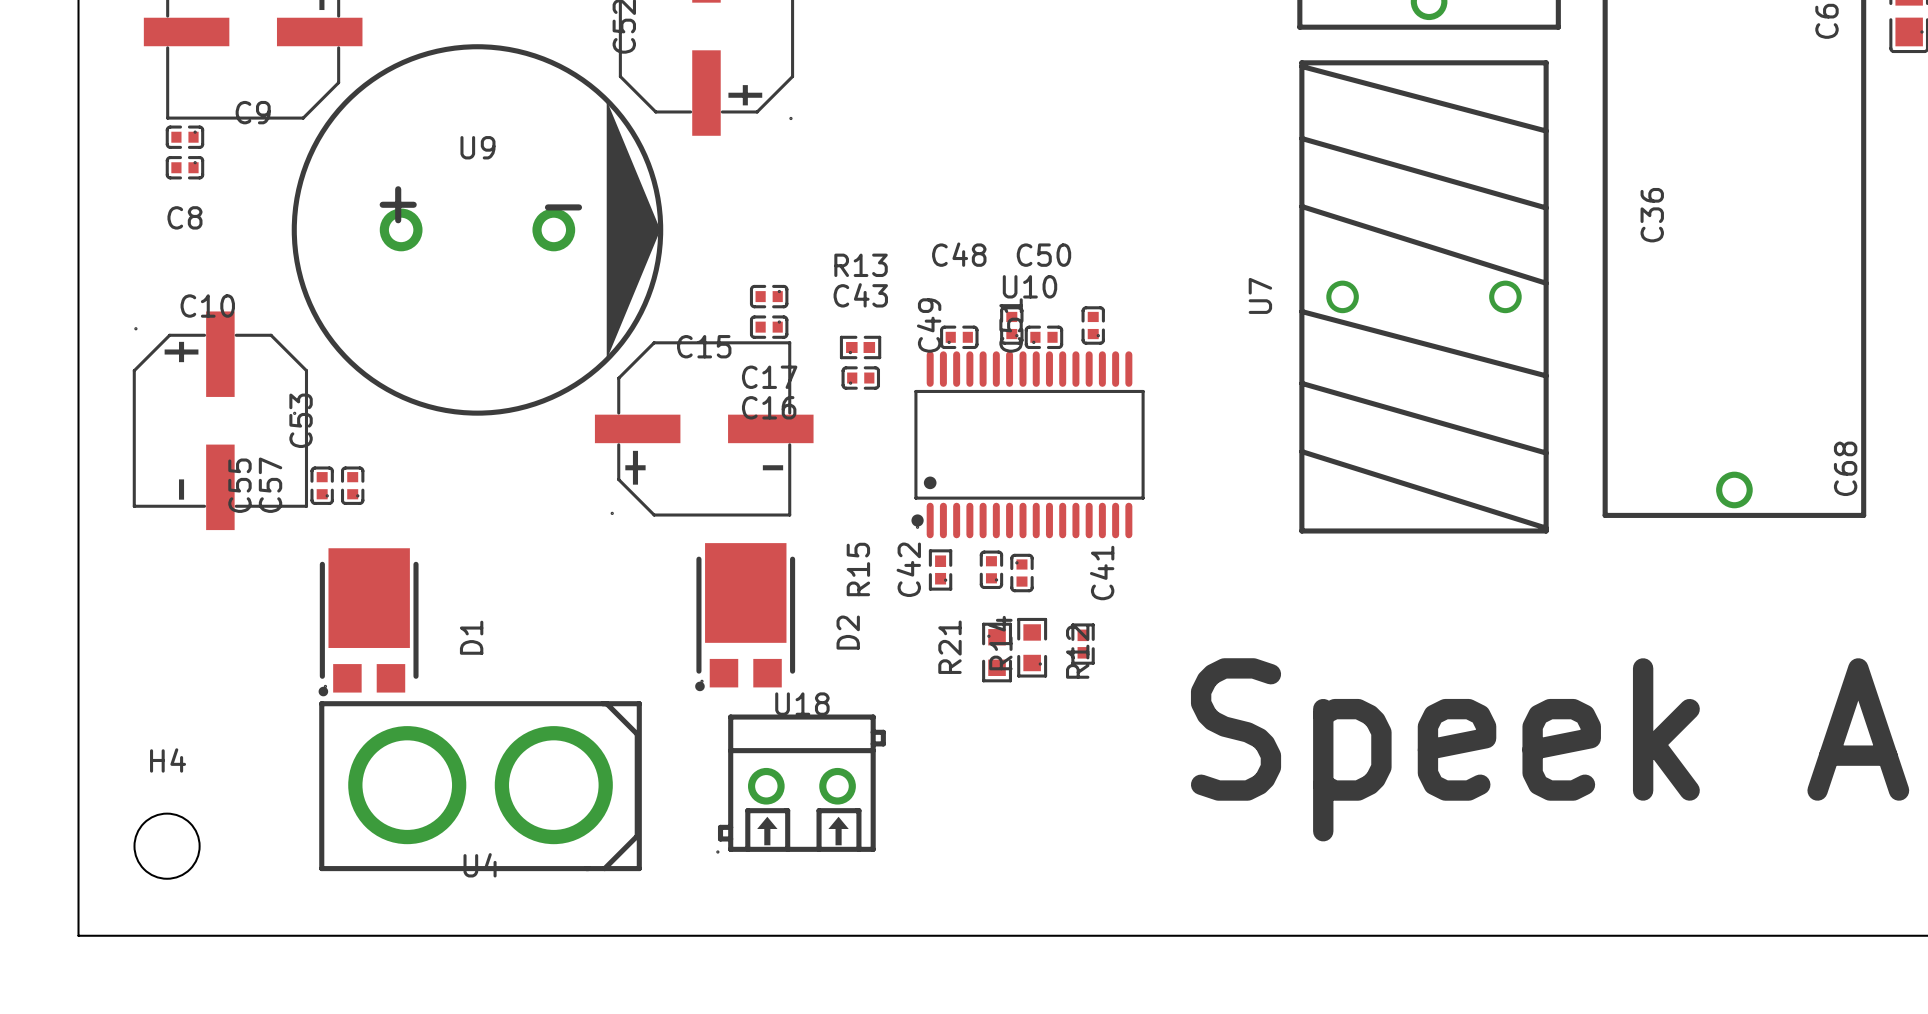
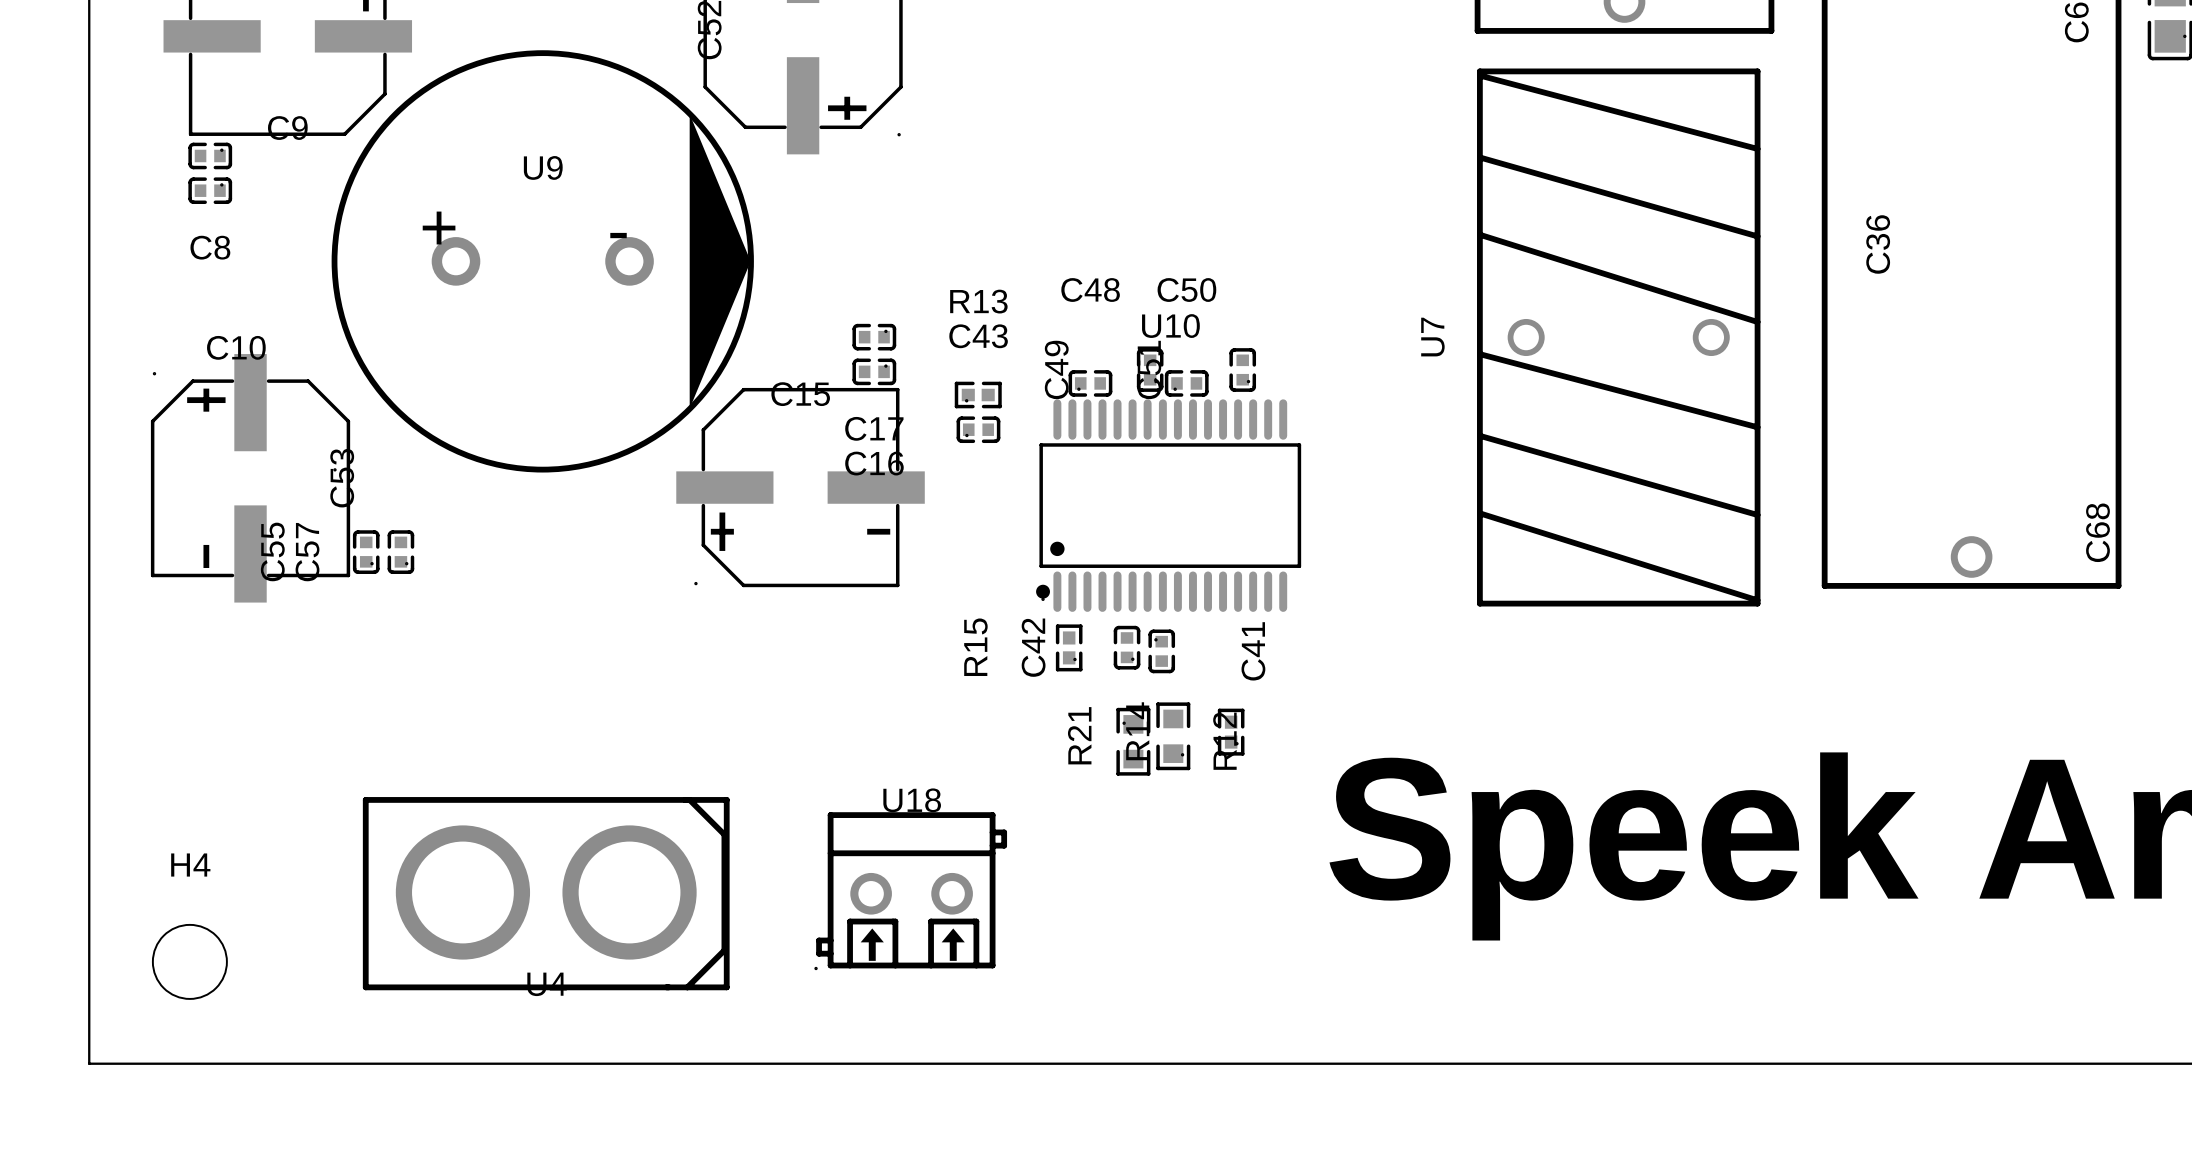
D2: (745, 617) -> none
D1: (368, 622) -> none

